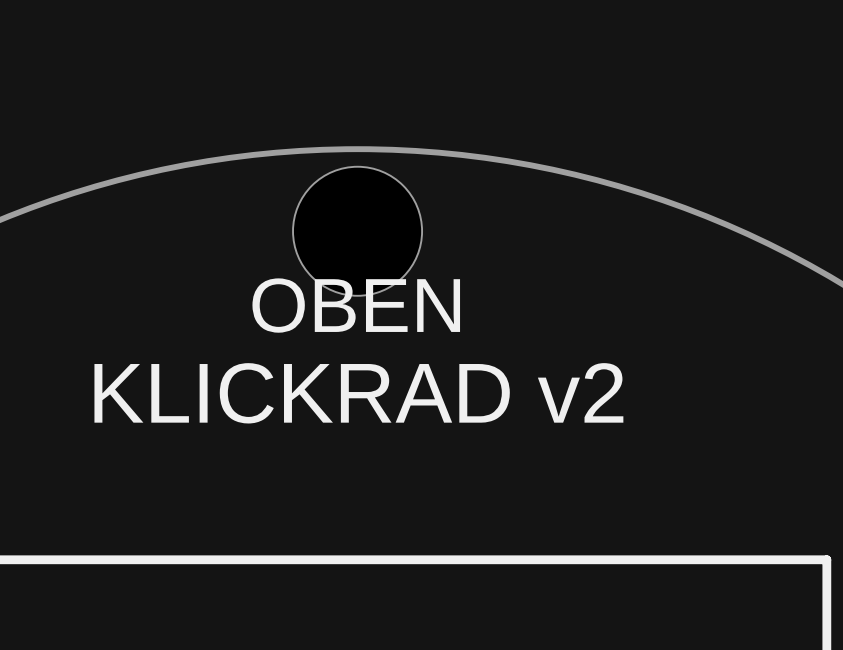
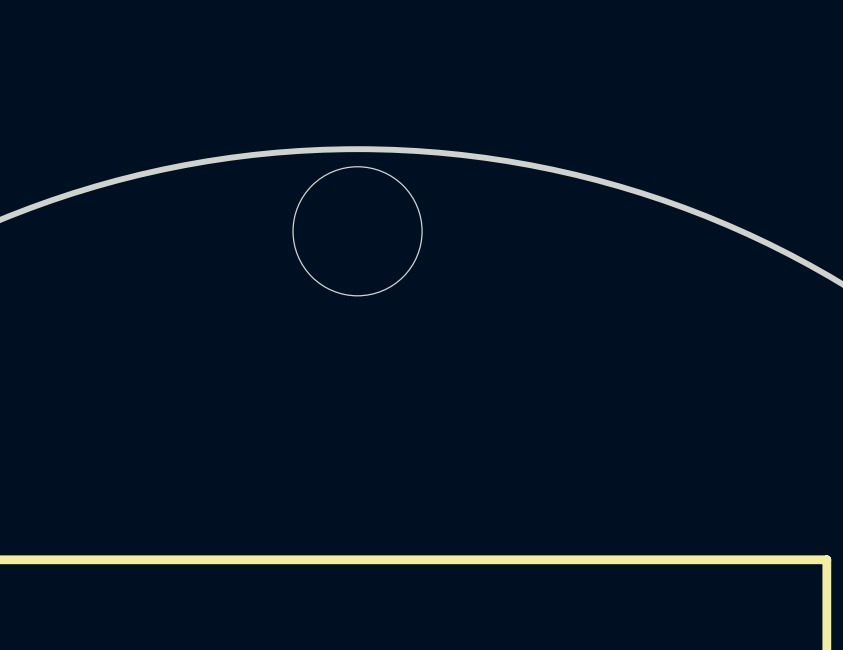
text: OBEN (356, 305) -> none
text: KLICKRAD v2 (358, 393) -> none

